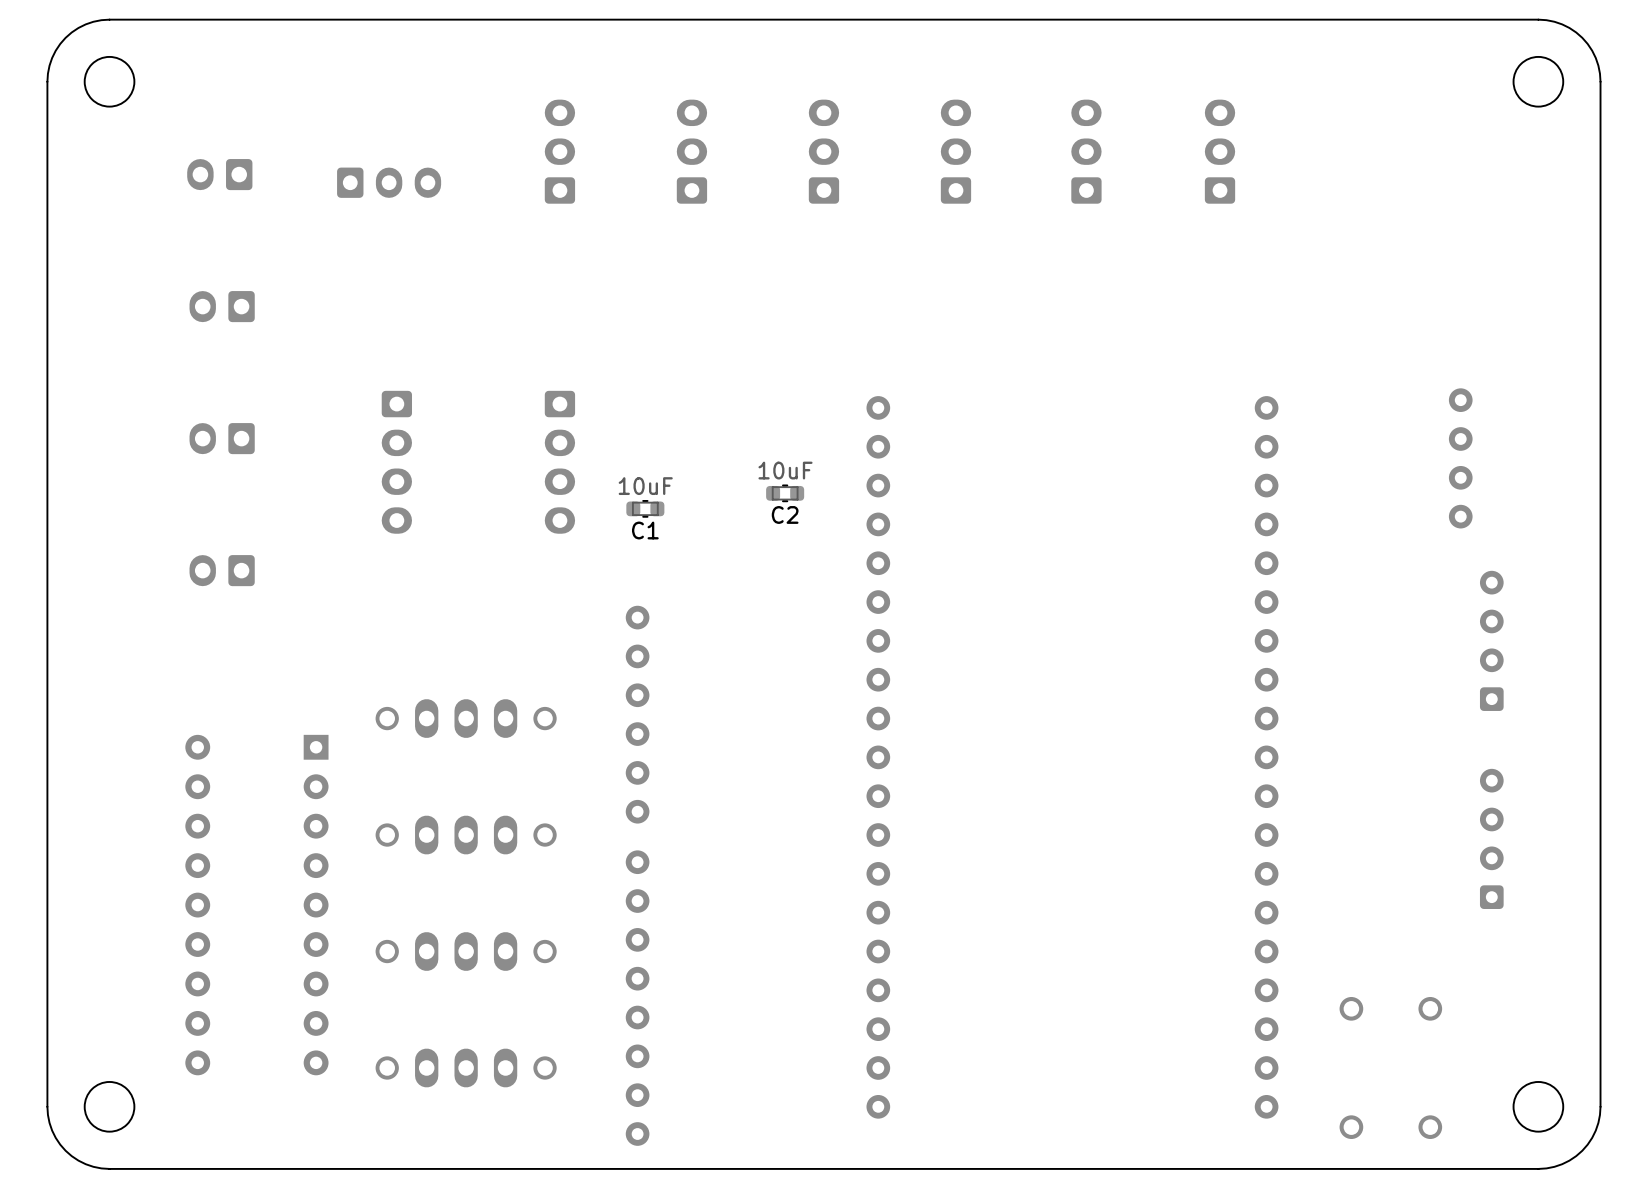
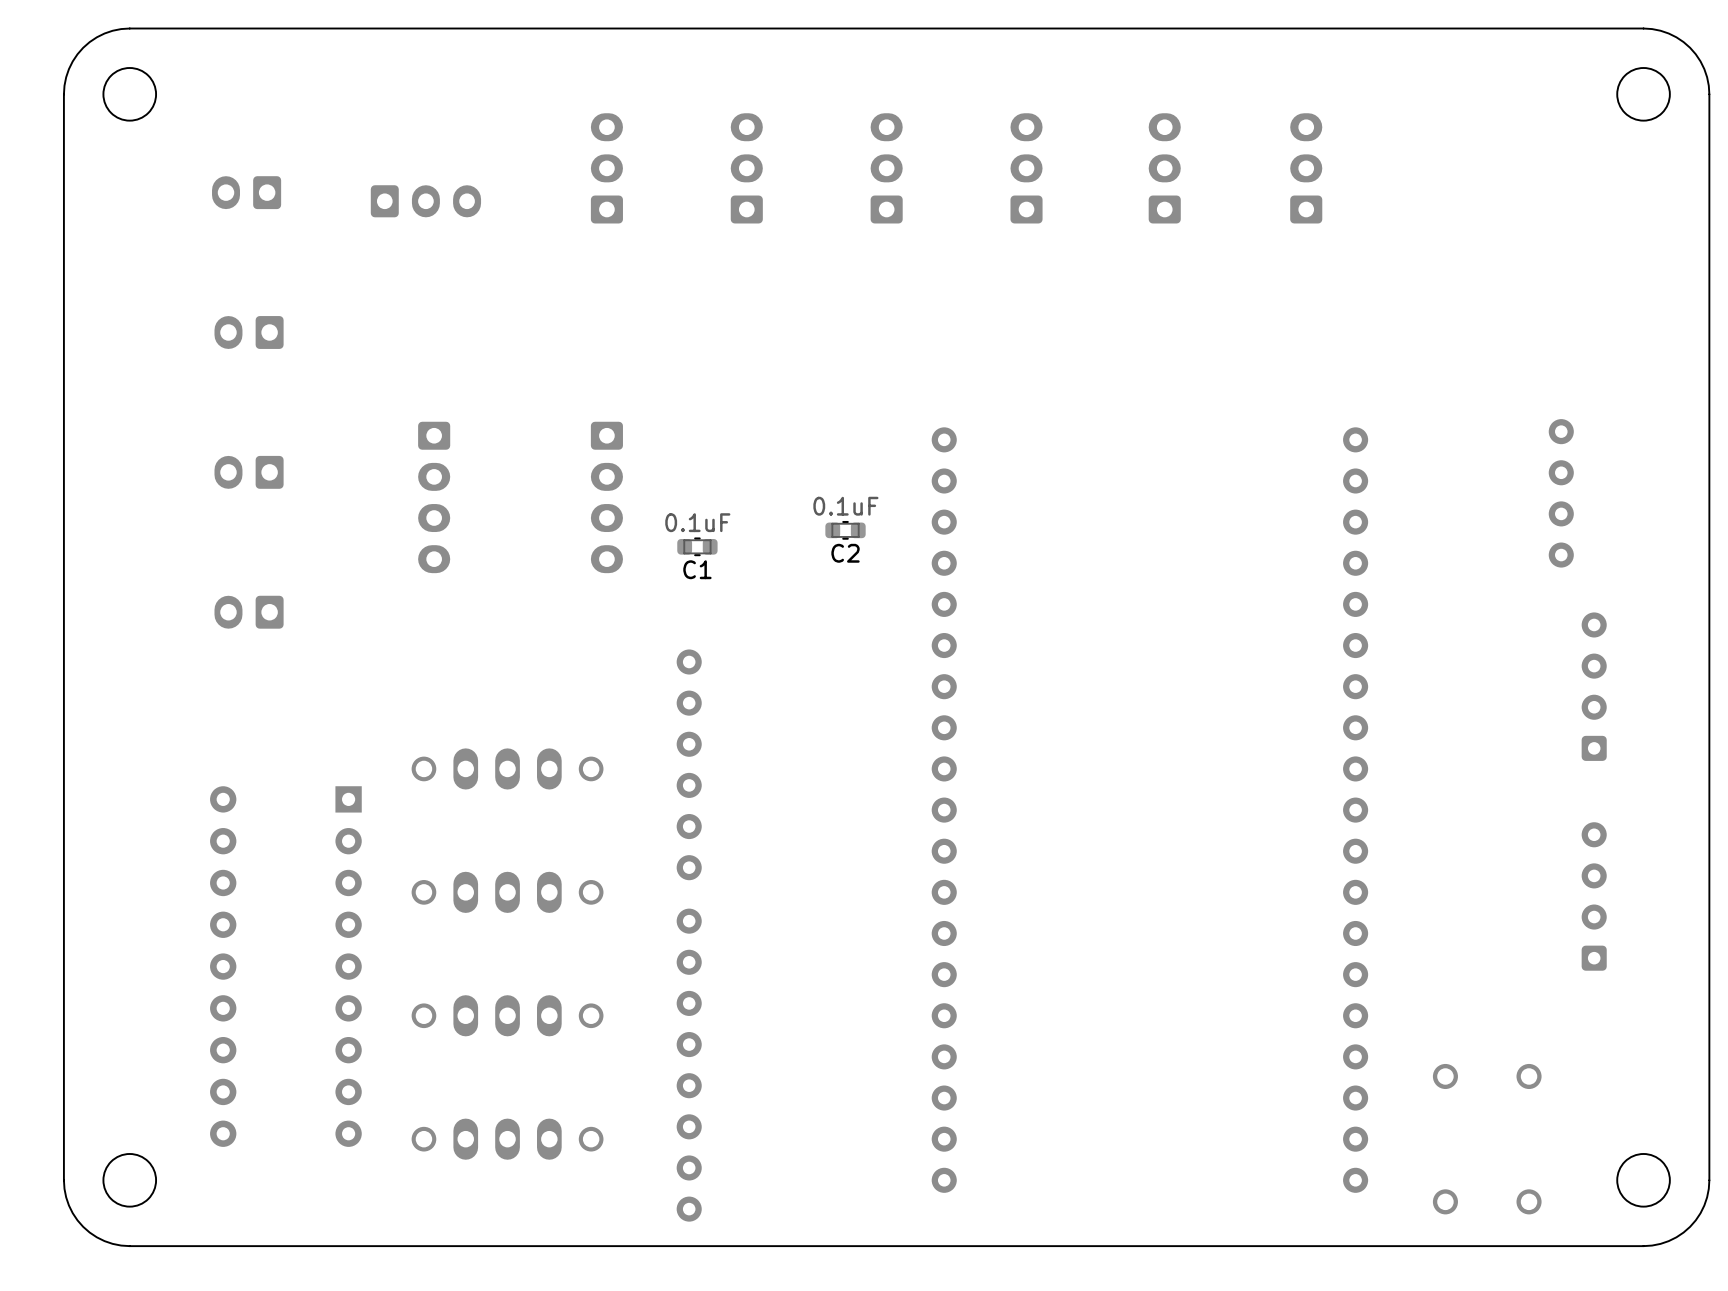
C2 value: 10uF (785, 470) -> 0.1uF (845, 506)
C1 value: 10uF (645, 486) -> 0.1uF (697, 522)

